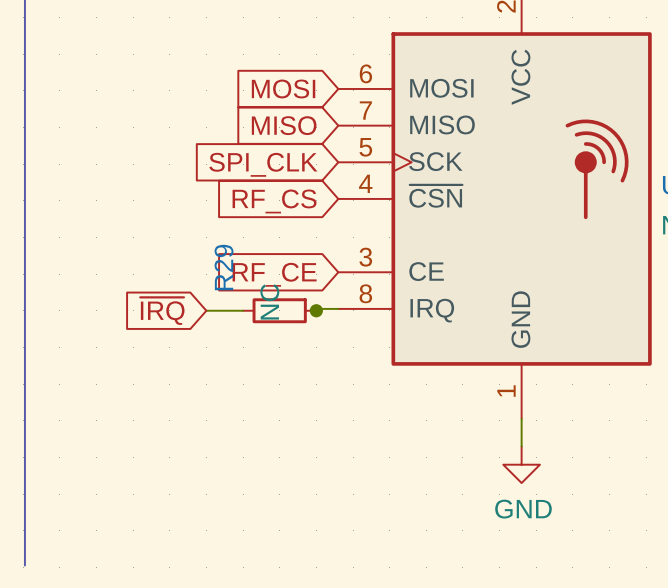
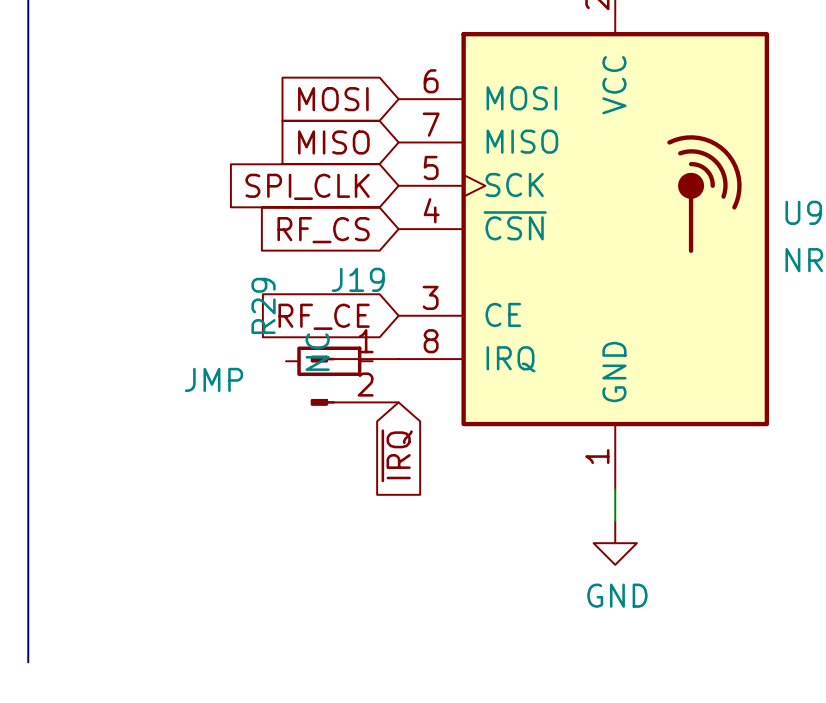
wire: (206, 310) (243, 310) -> none
junction: (316, 310) -> none
global label rotation: 0° (162, 311) -> 90° counterclockwise (397, 455)
global label position: ~{IRQ} (162, 311) -> ~{IRQ} (397, 455)
J19: none -> JMP (354, 380)

